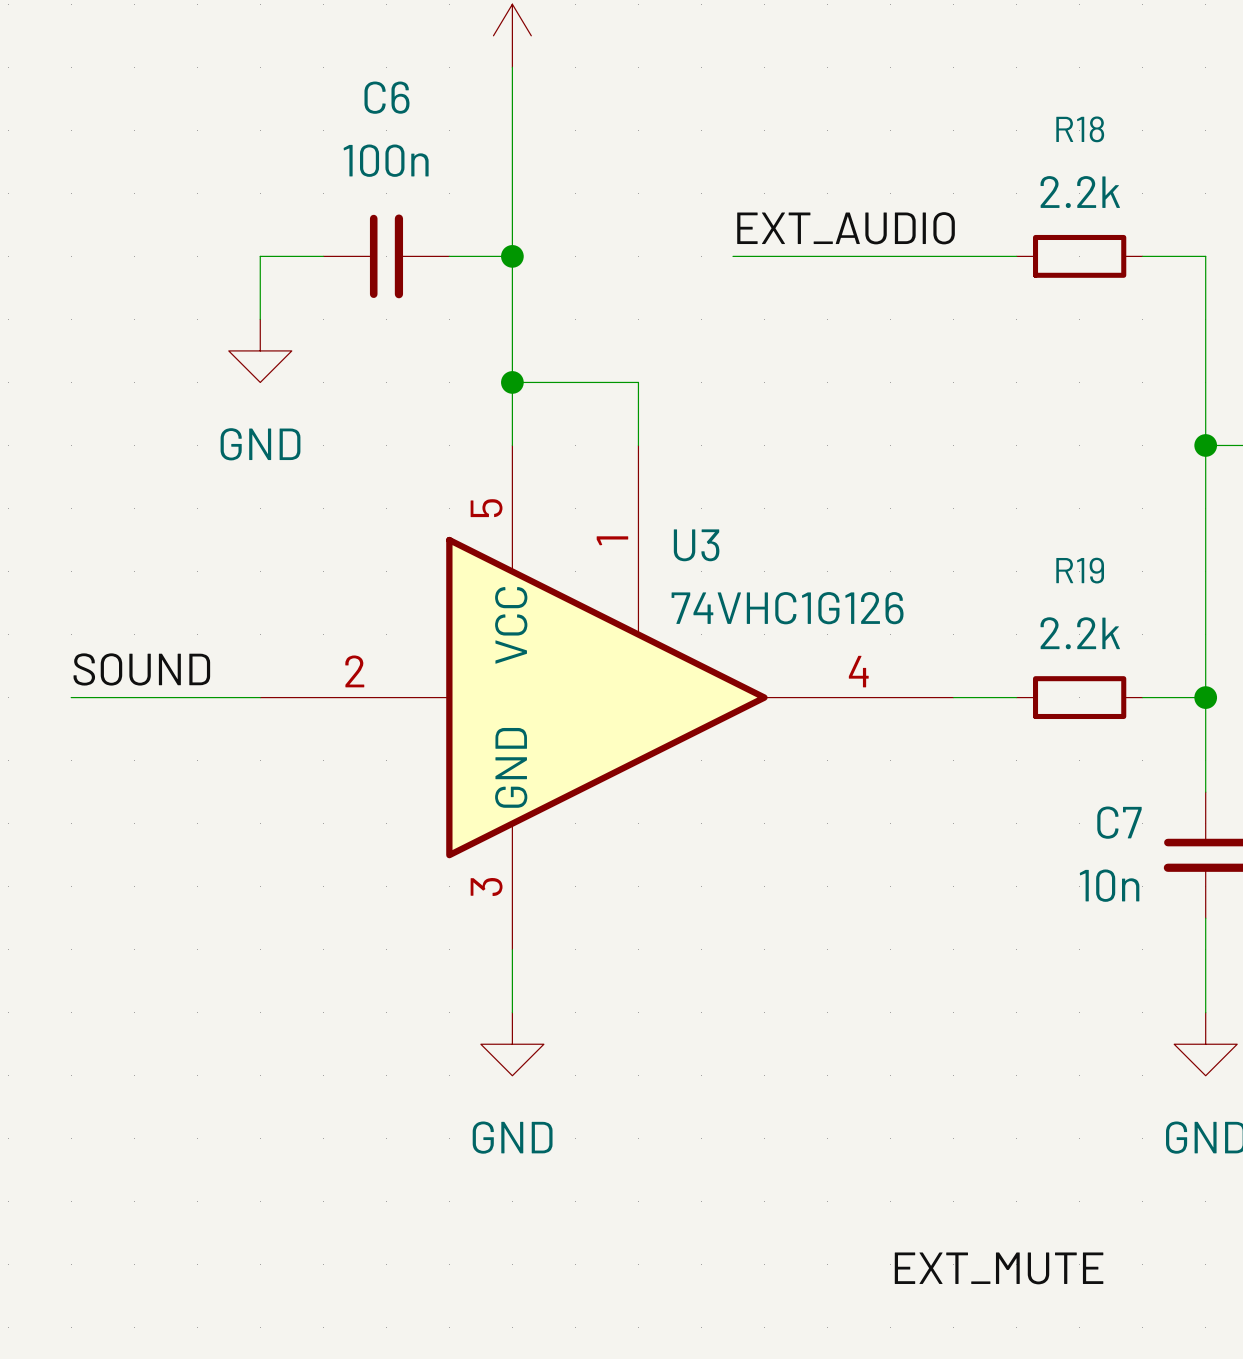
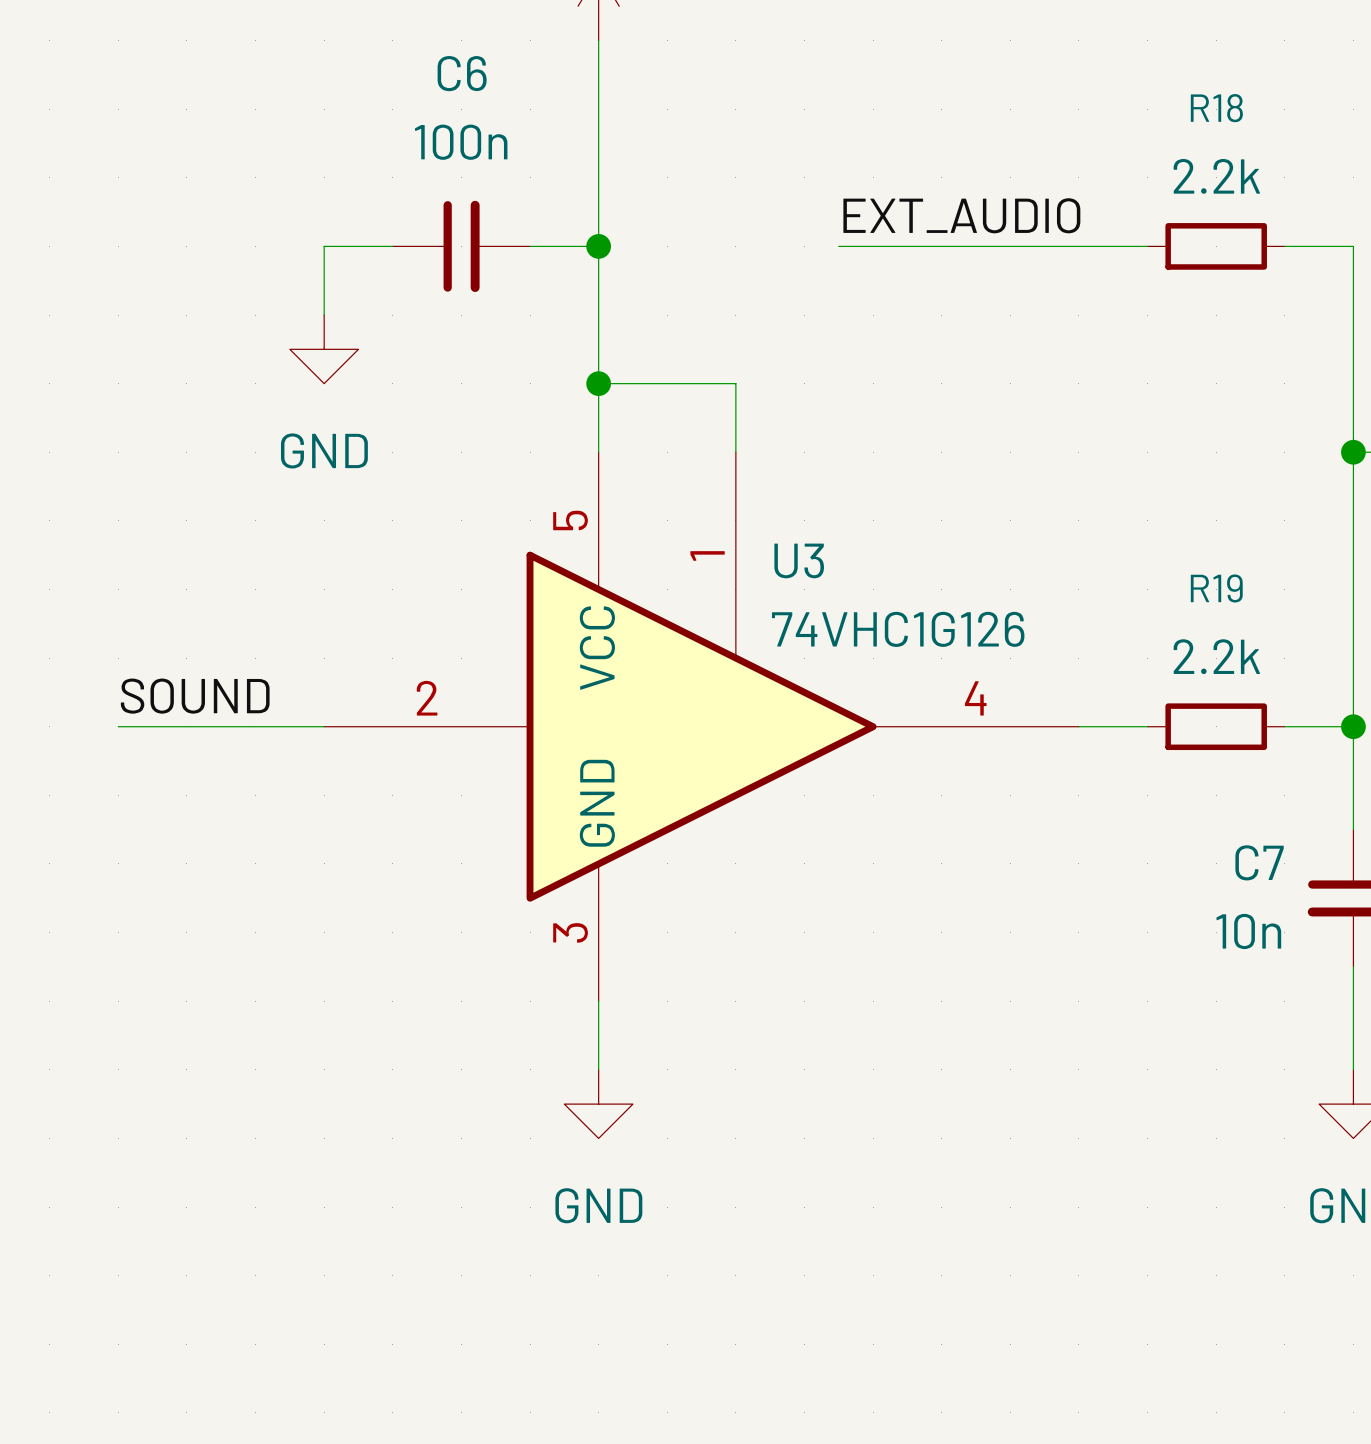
label: EXT_MUTE (999, 1268) -> none

